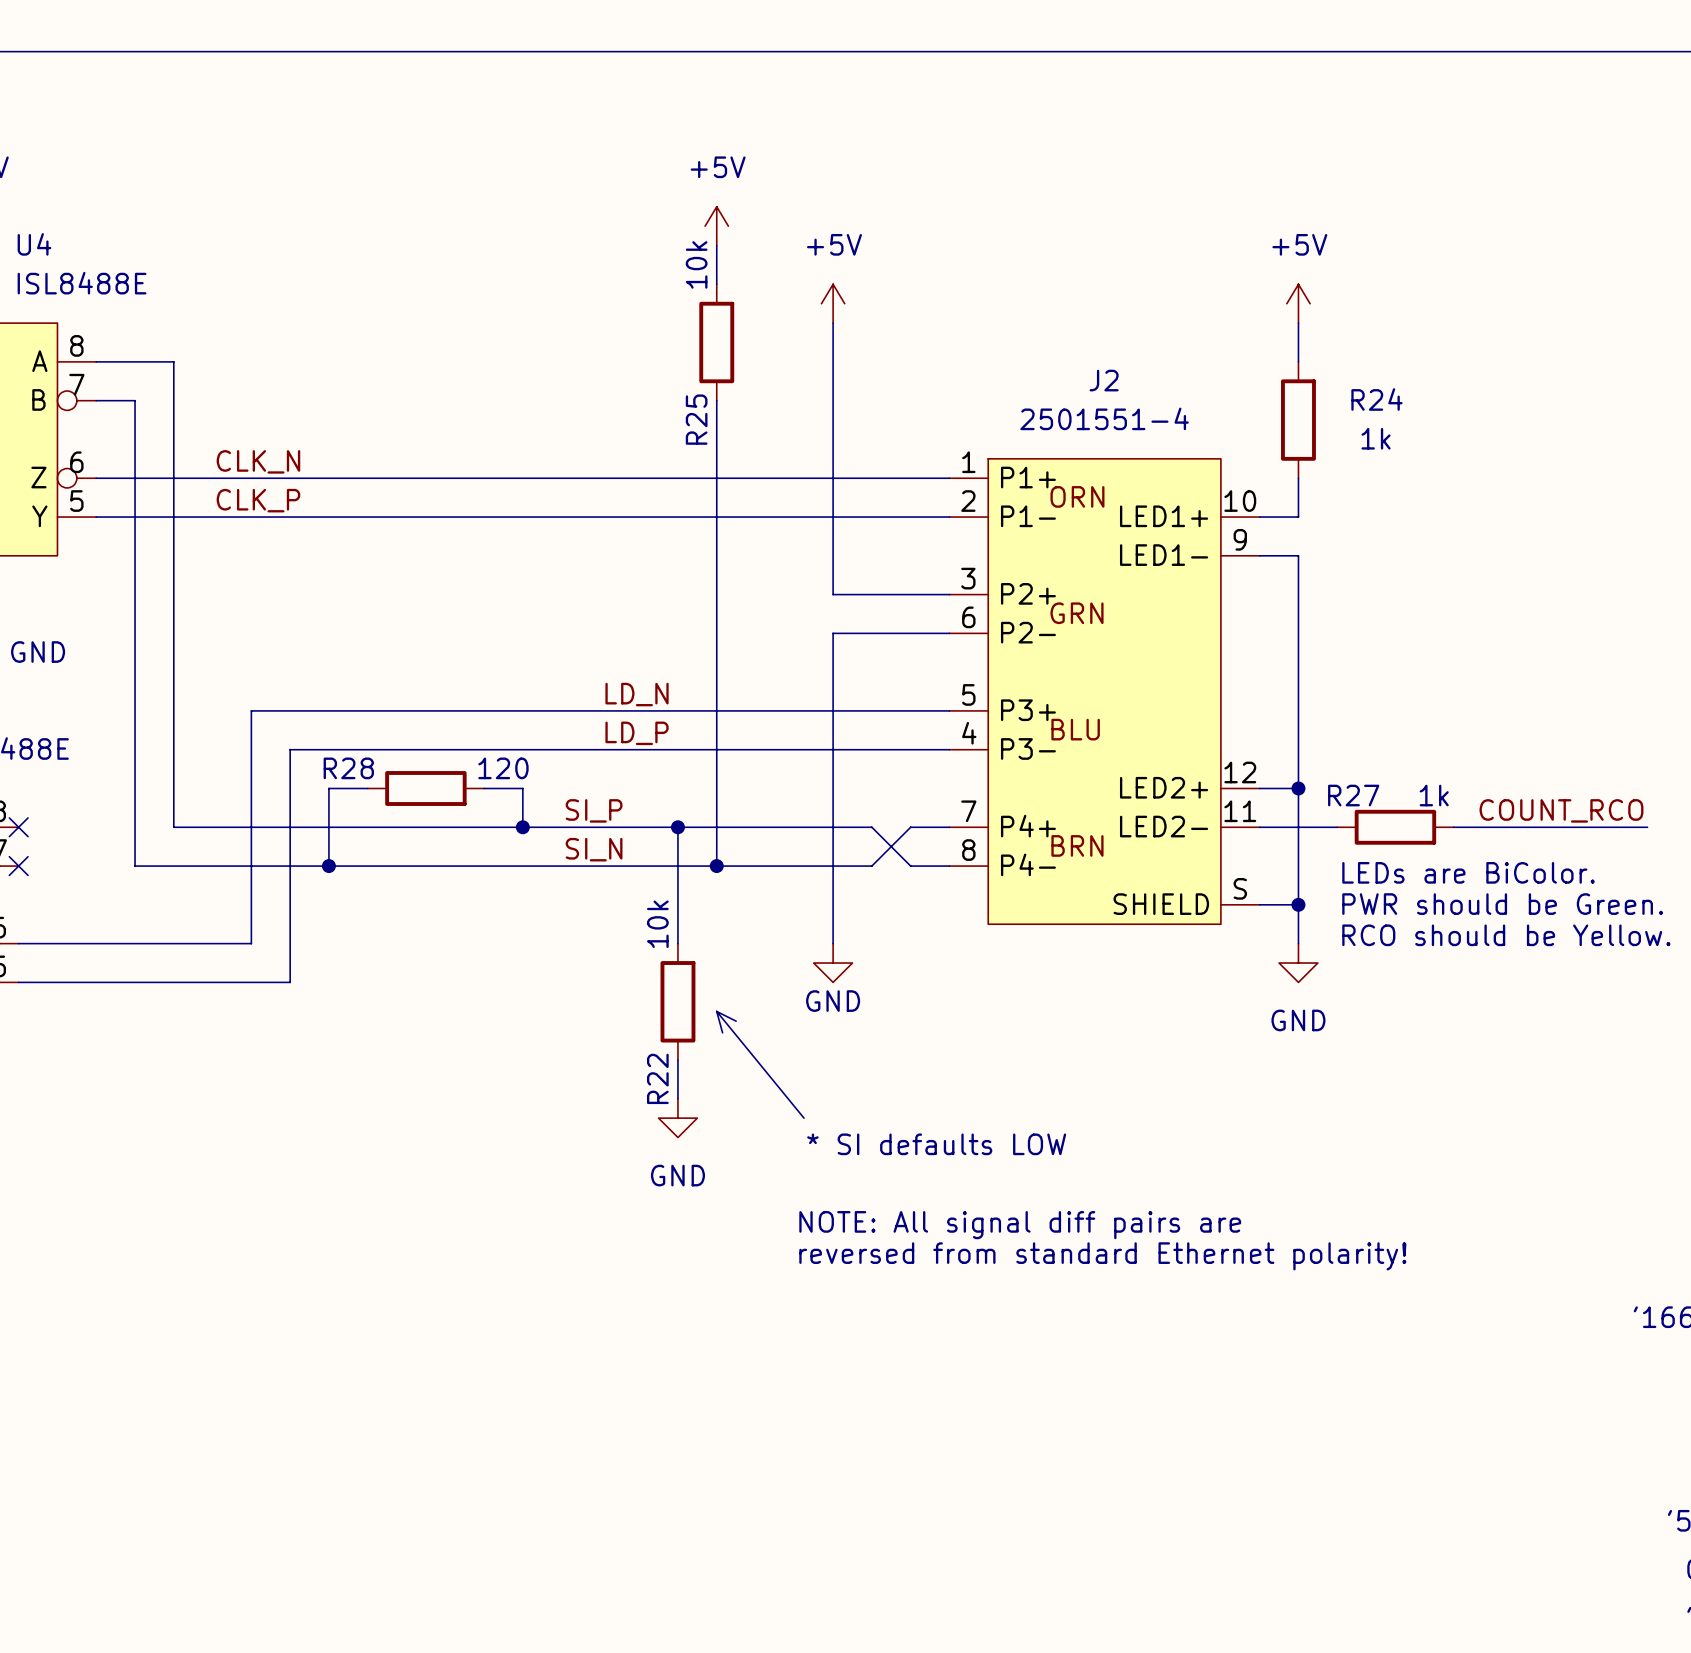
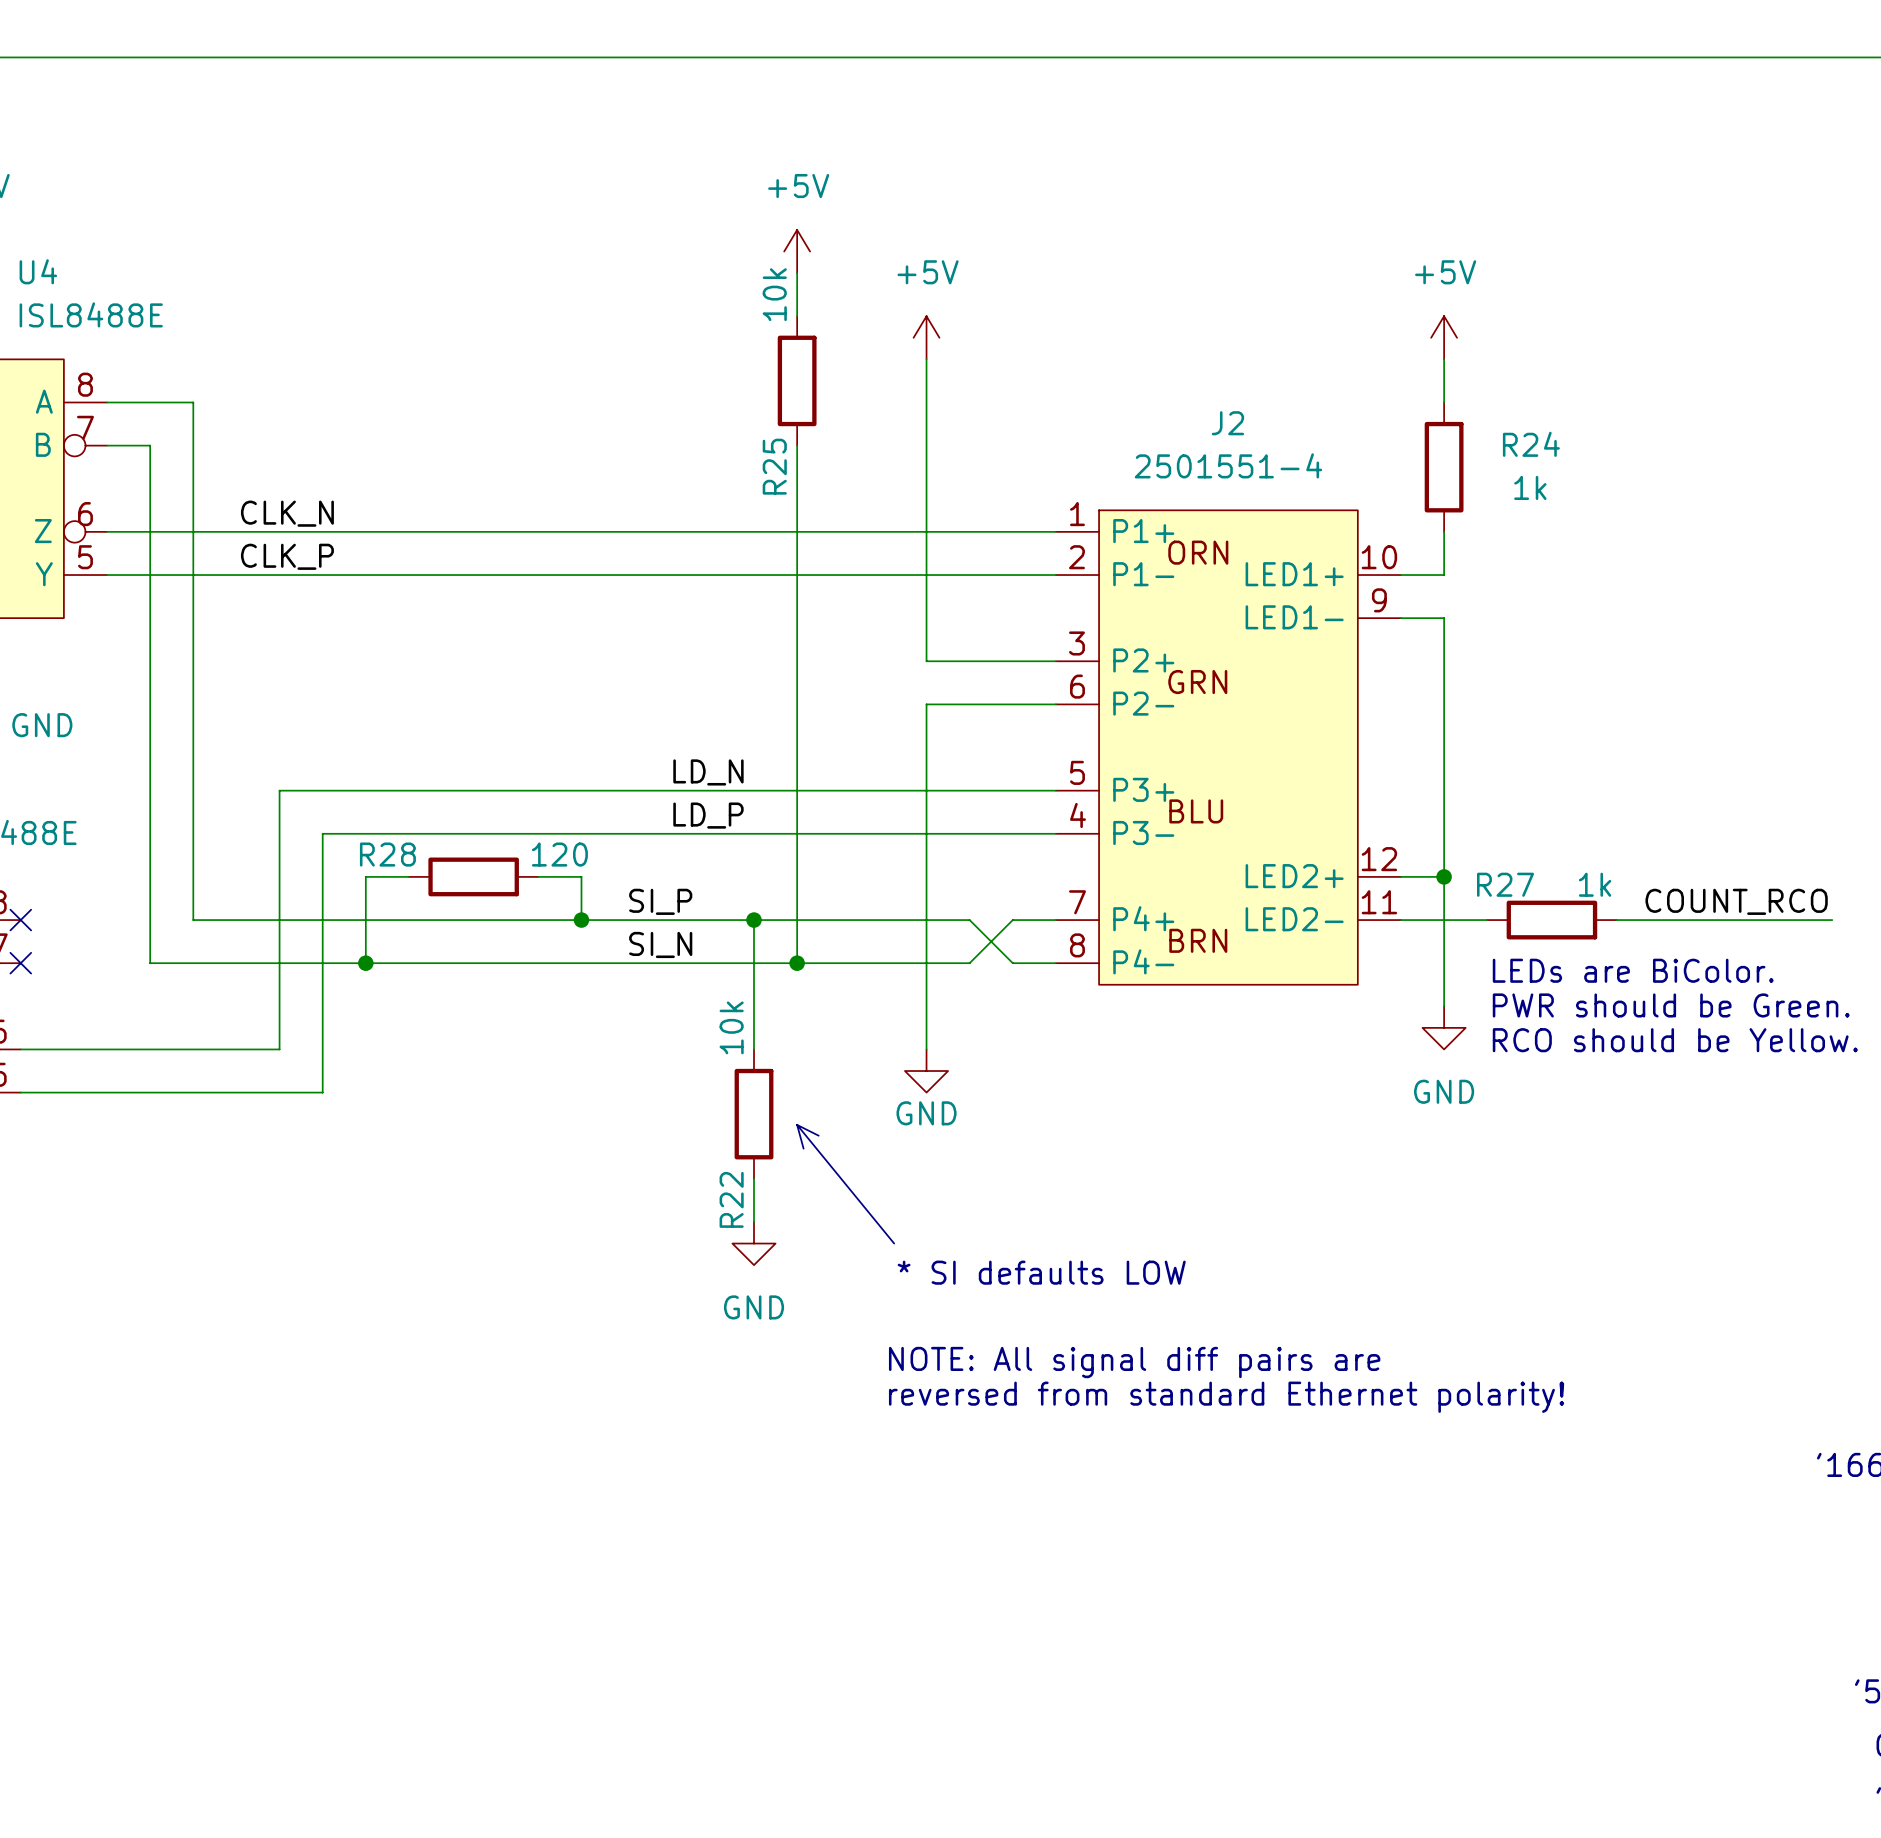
J2 symbol: [949, 458, 1260, 925] -> [1055, 510, 1401, 985]
wire: (1259, 904) (1298, 904) (1298, 943) -> none
junction: (1298, 904) -> none
power symbol position: GND (1298, 963) -> GND (1444, 1027)

